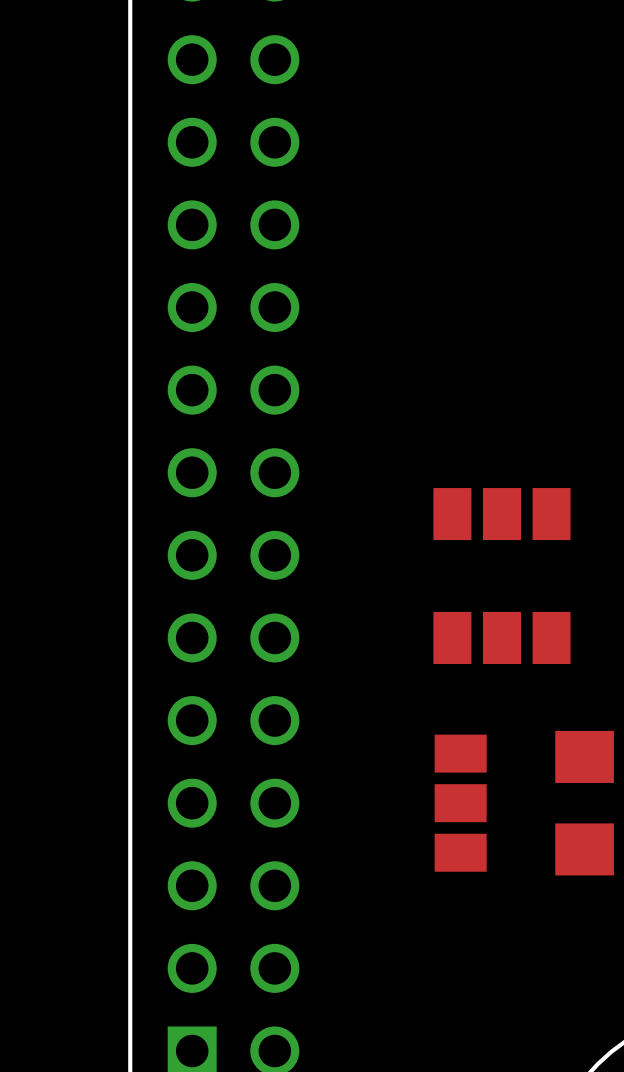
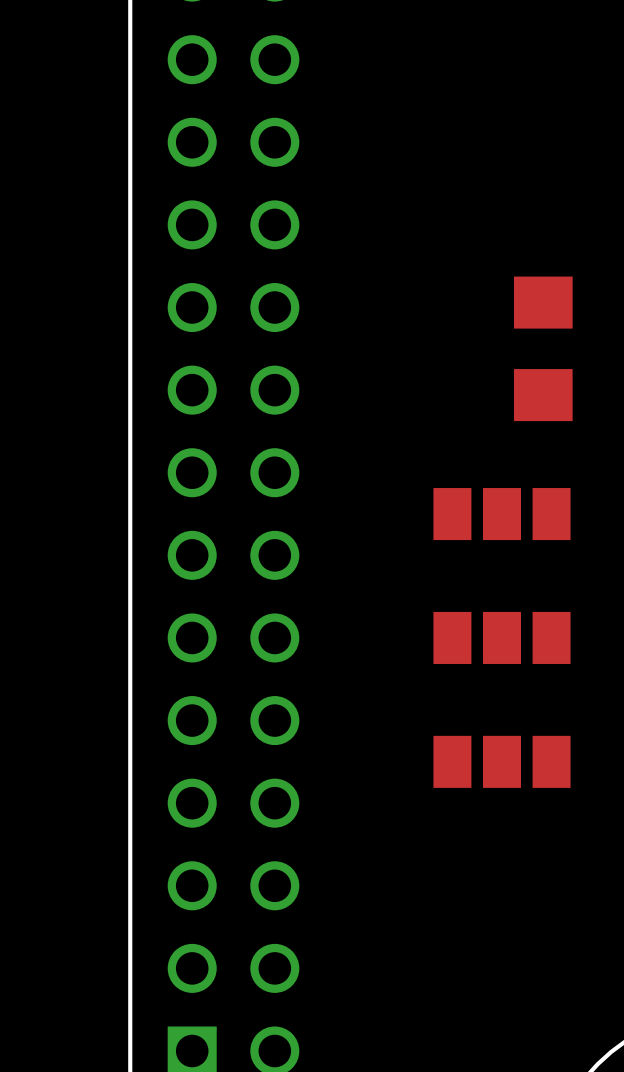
part: none -> (543, 348)
part rotation: 0° (460, 803) -> 90° clockwise (502, 761)
part: (584, 803) -> none

